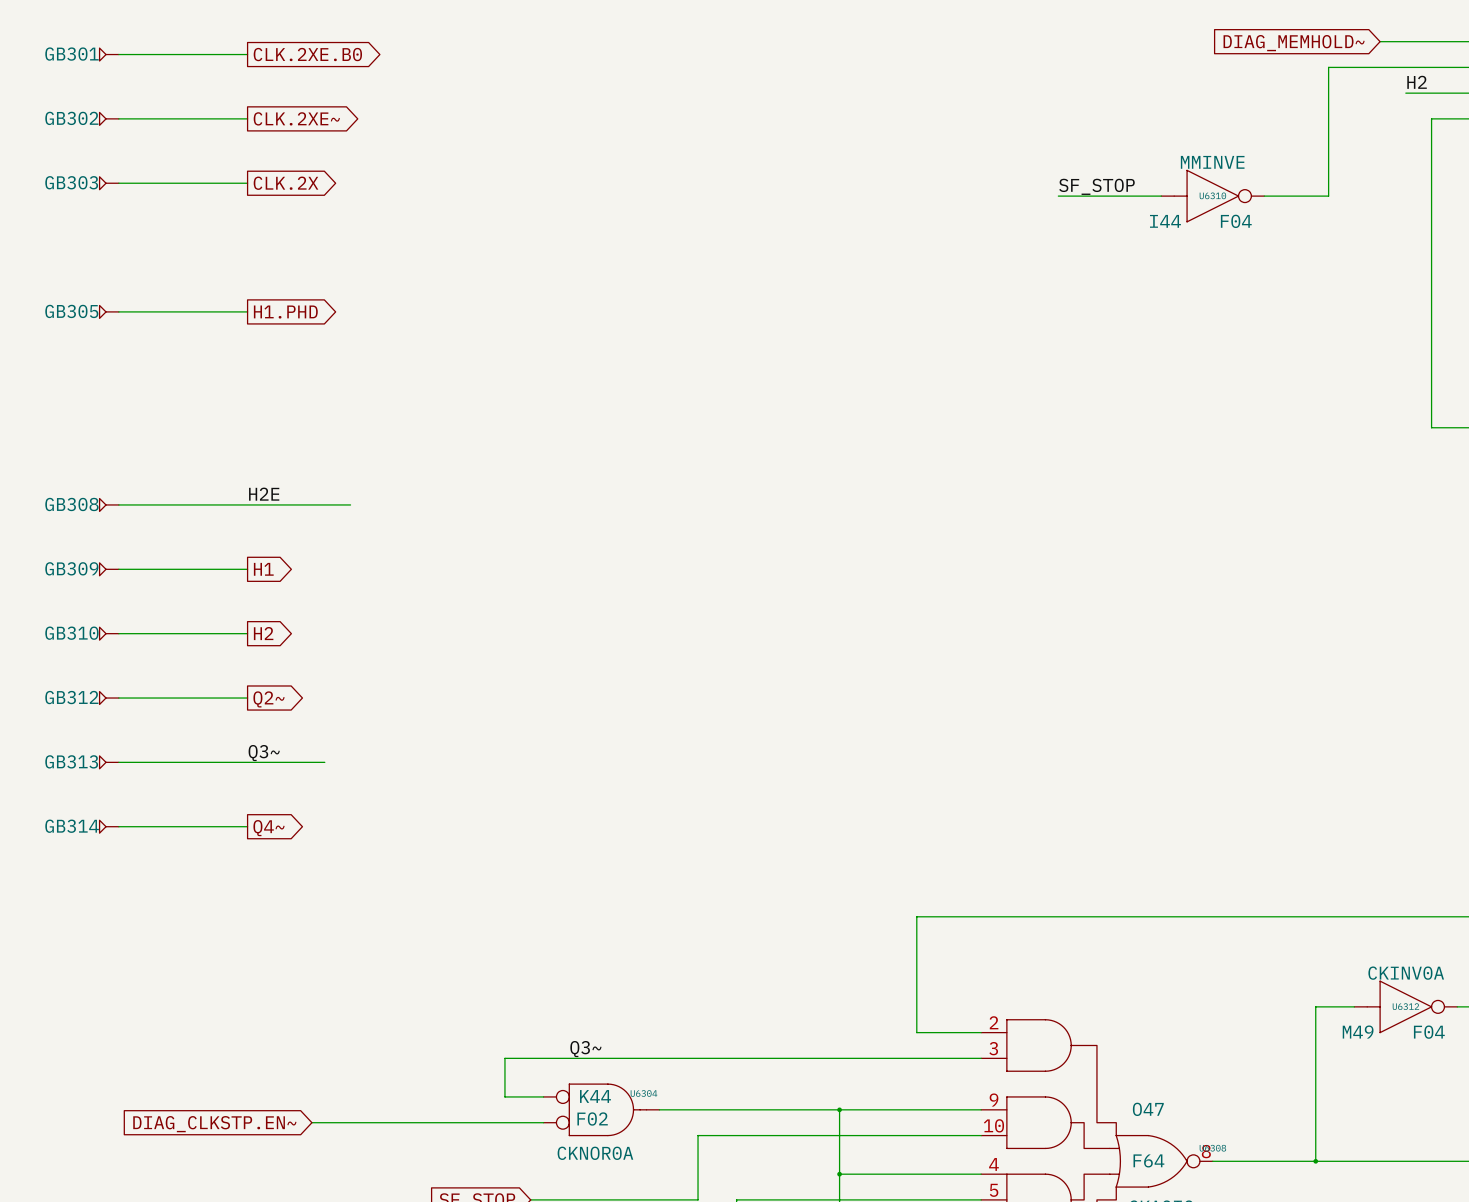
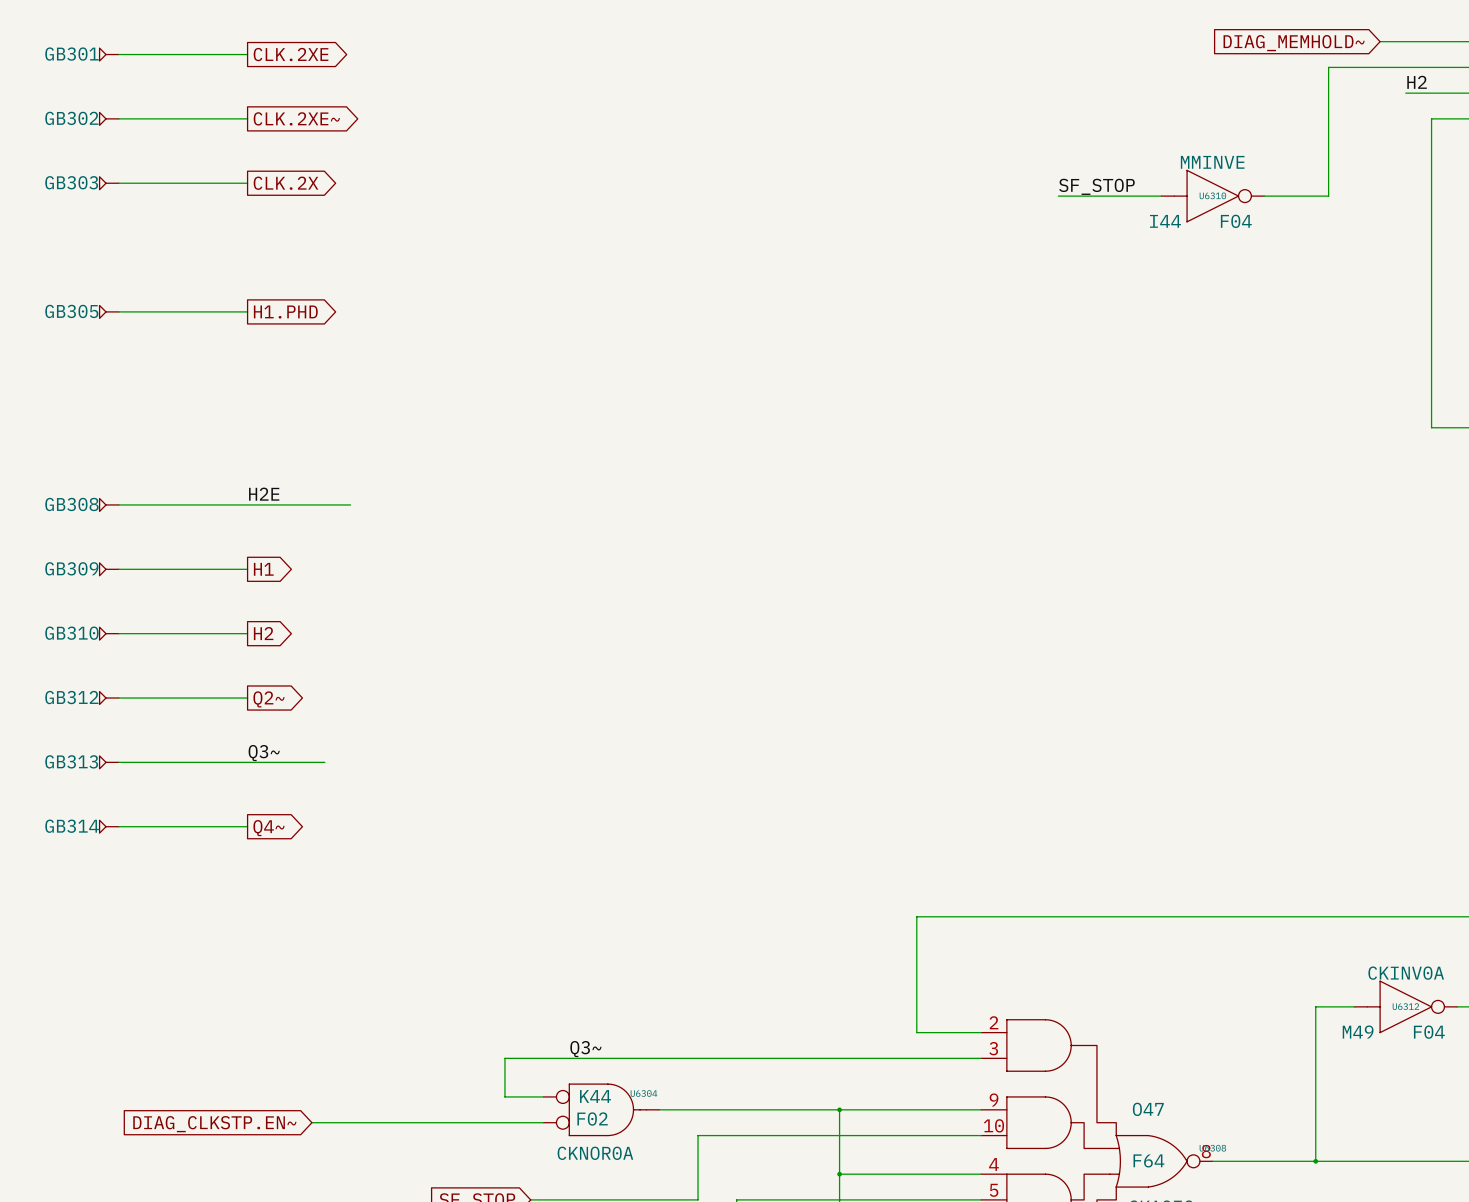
global label: CLK.2XE.B0 (307, 54) -> CLK.2XE (291, 54)

